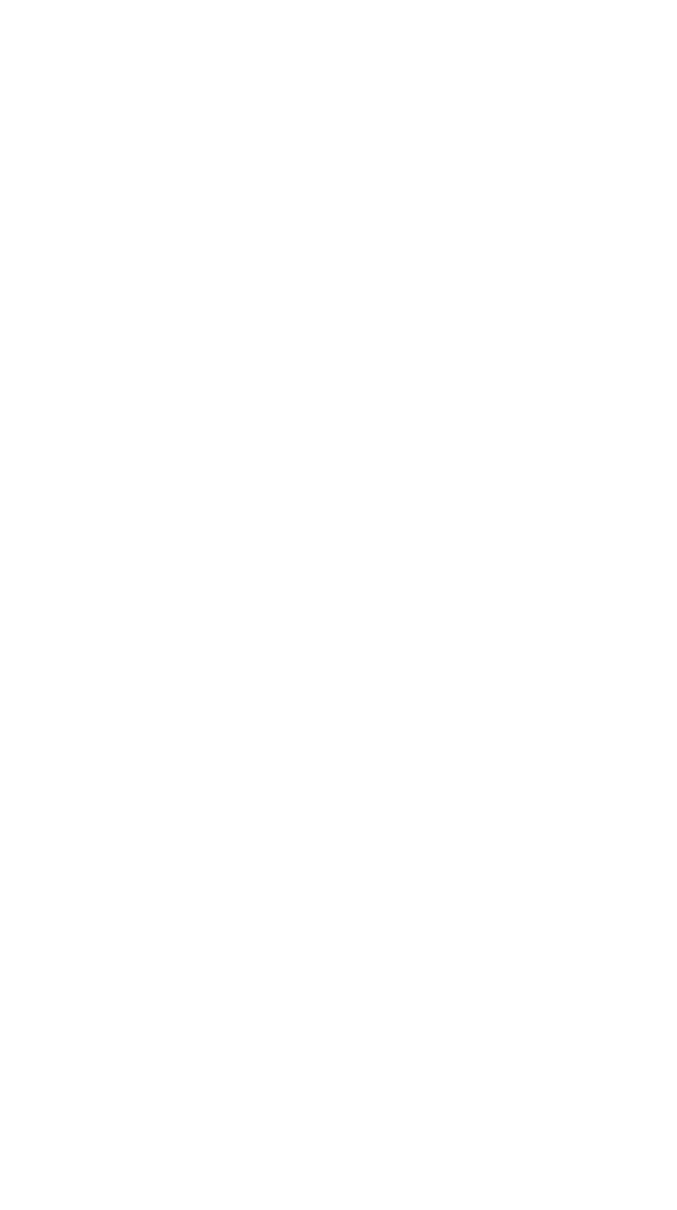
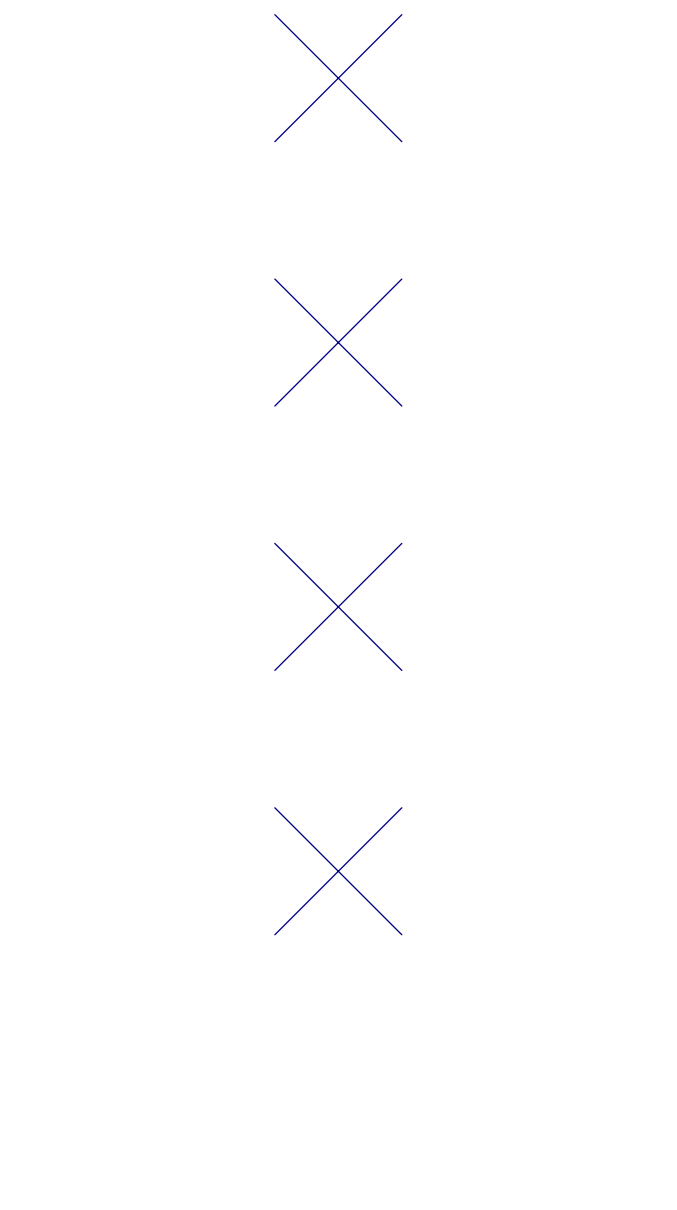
no-connect mark: none -> (338, 78)
no-connect mark: none -> (338, 342)
no-connect mark: none -> (338, 606)
no-connect mark: none -> (338, 871)

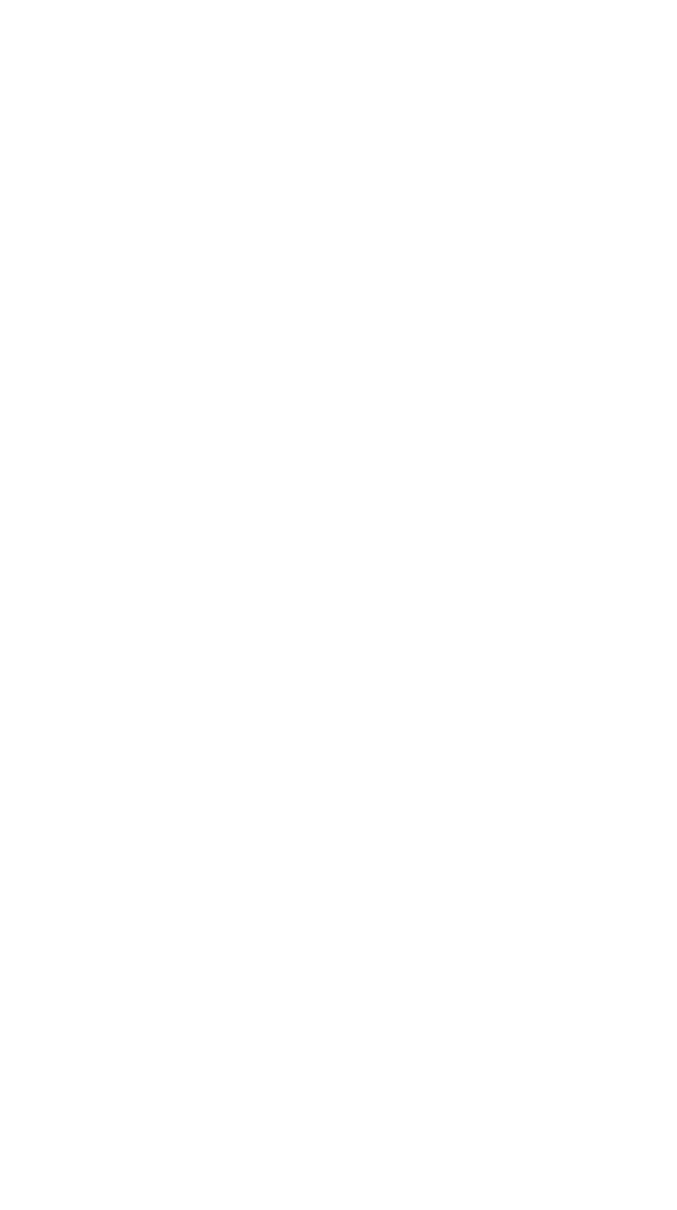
no-connect mark: (338, 78) -> none
no-connect mark: (338, 342) -> none
no-connect mark: (338, 606) -> none
no-connect mark: (338, 871) -> none

